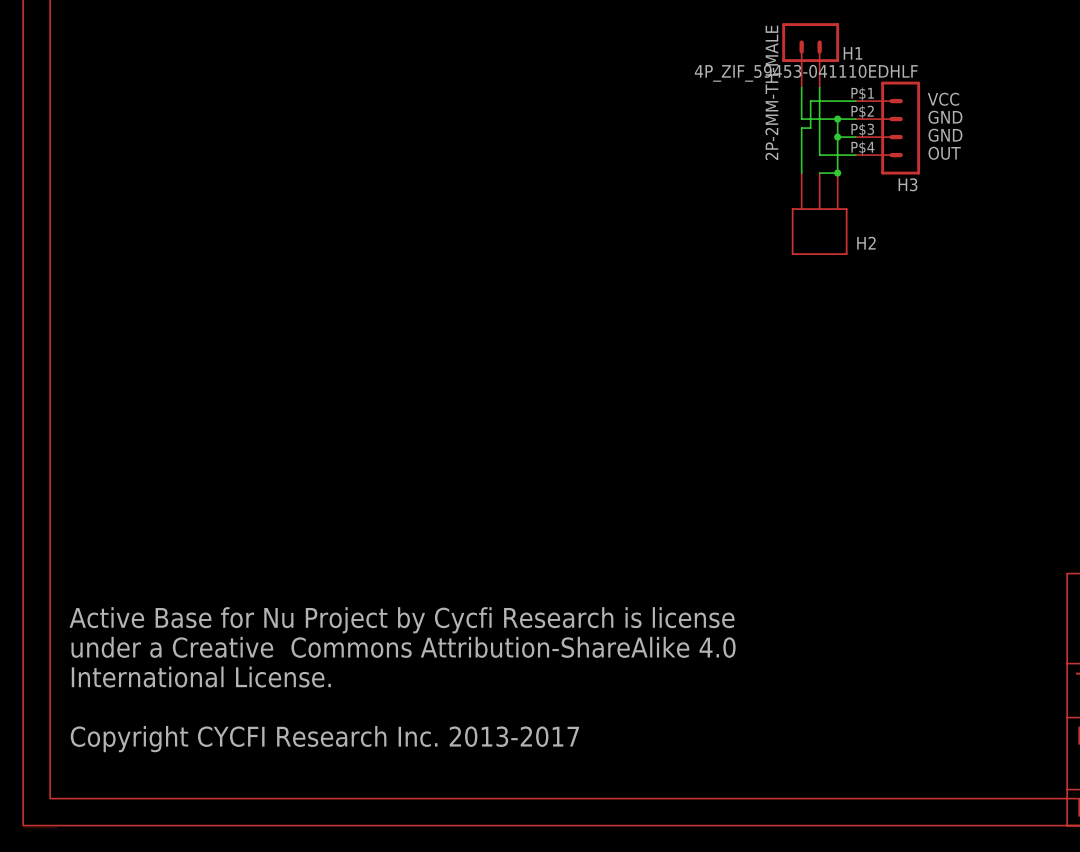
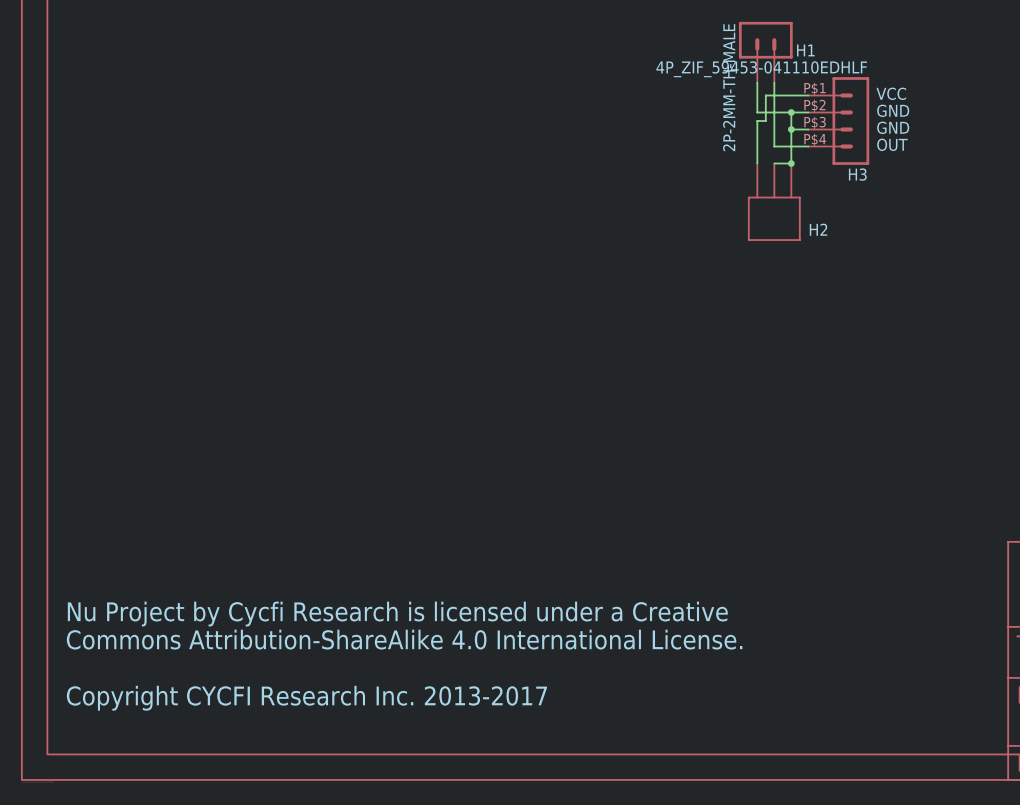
text: Active Base for Nu Project by Cycfi Research is license (402, 620) -> none
text: under a Creative Commons Attribution-ShareAlike 4.0 (403, 647) -> Nu Project by Cycfi Research is licensed under a Creative (397, 614)
text: International License. (201, 677) -> Commons Attribution-ShareAlike 4.0 International License. (404, 639)

